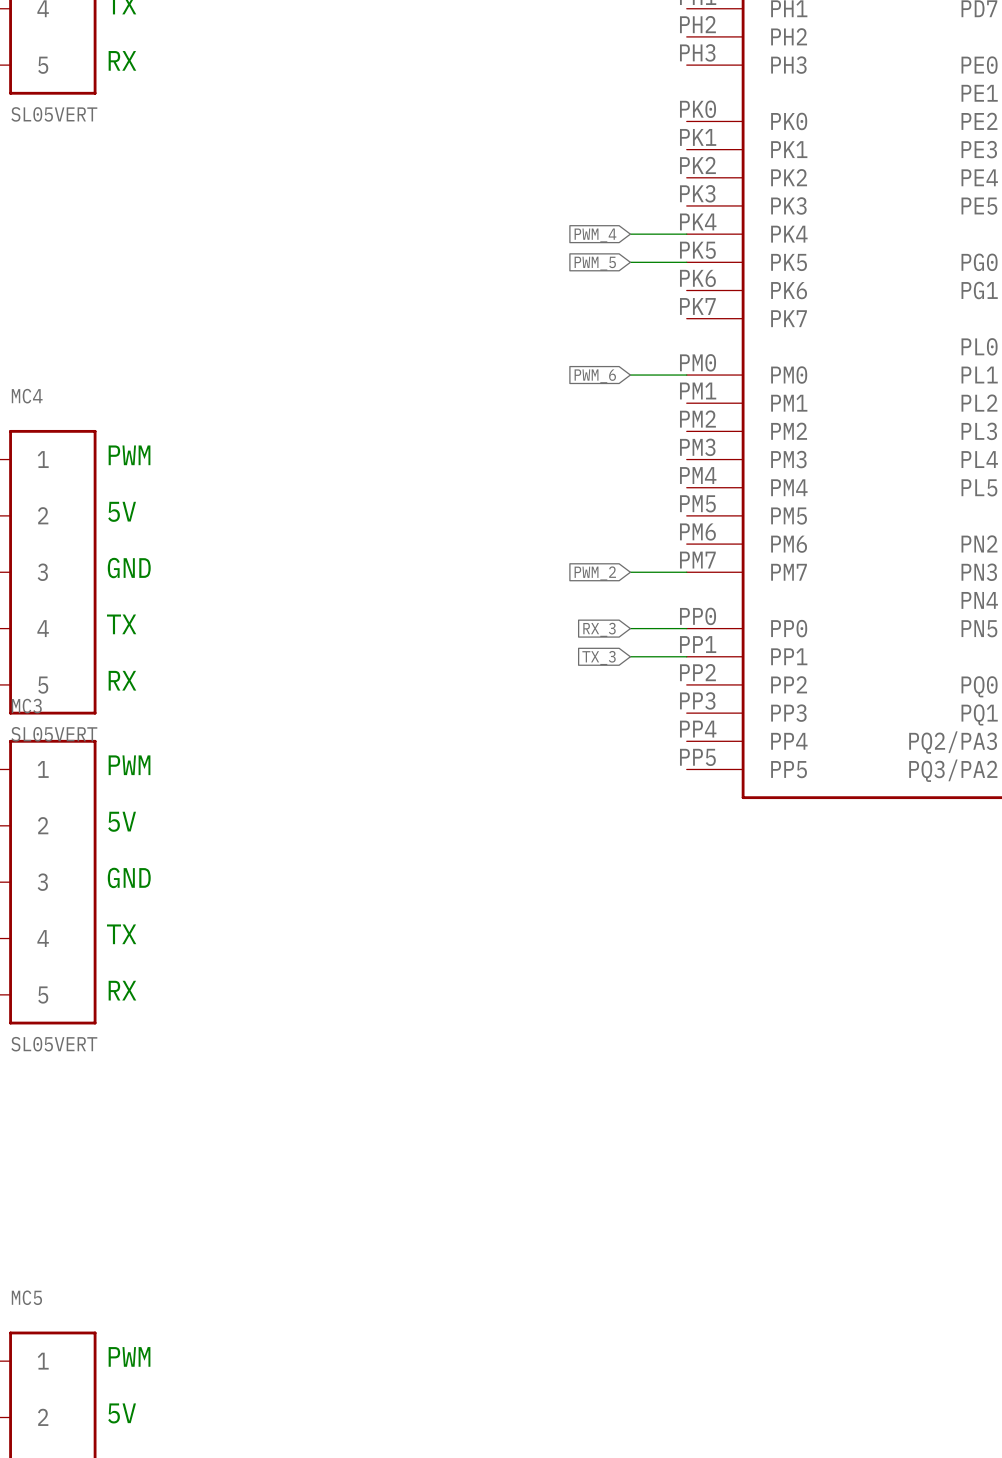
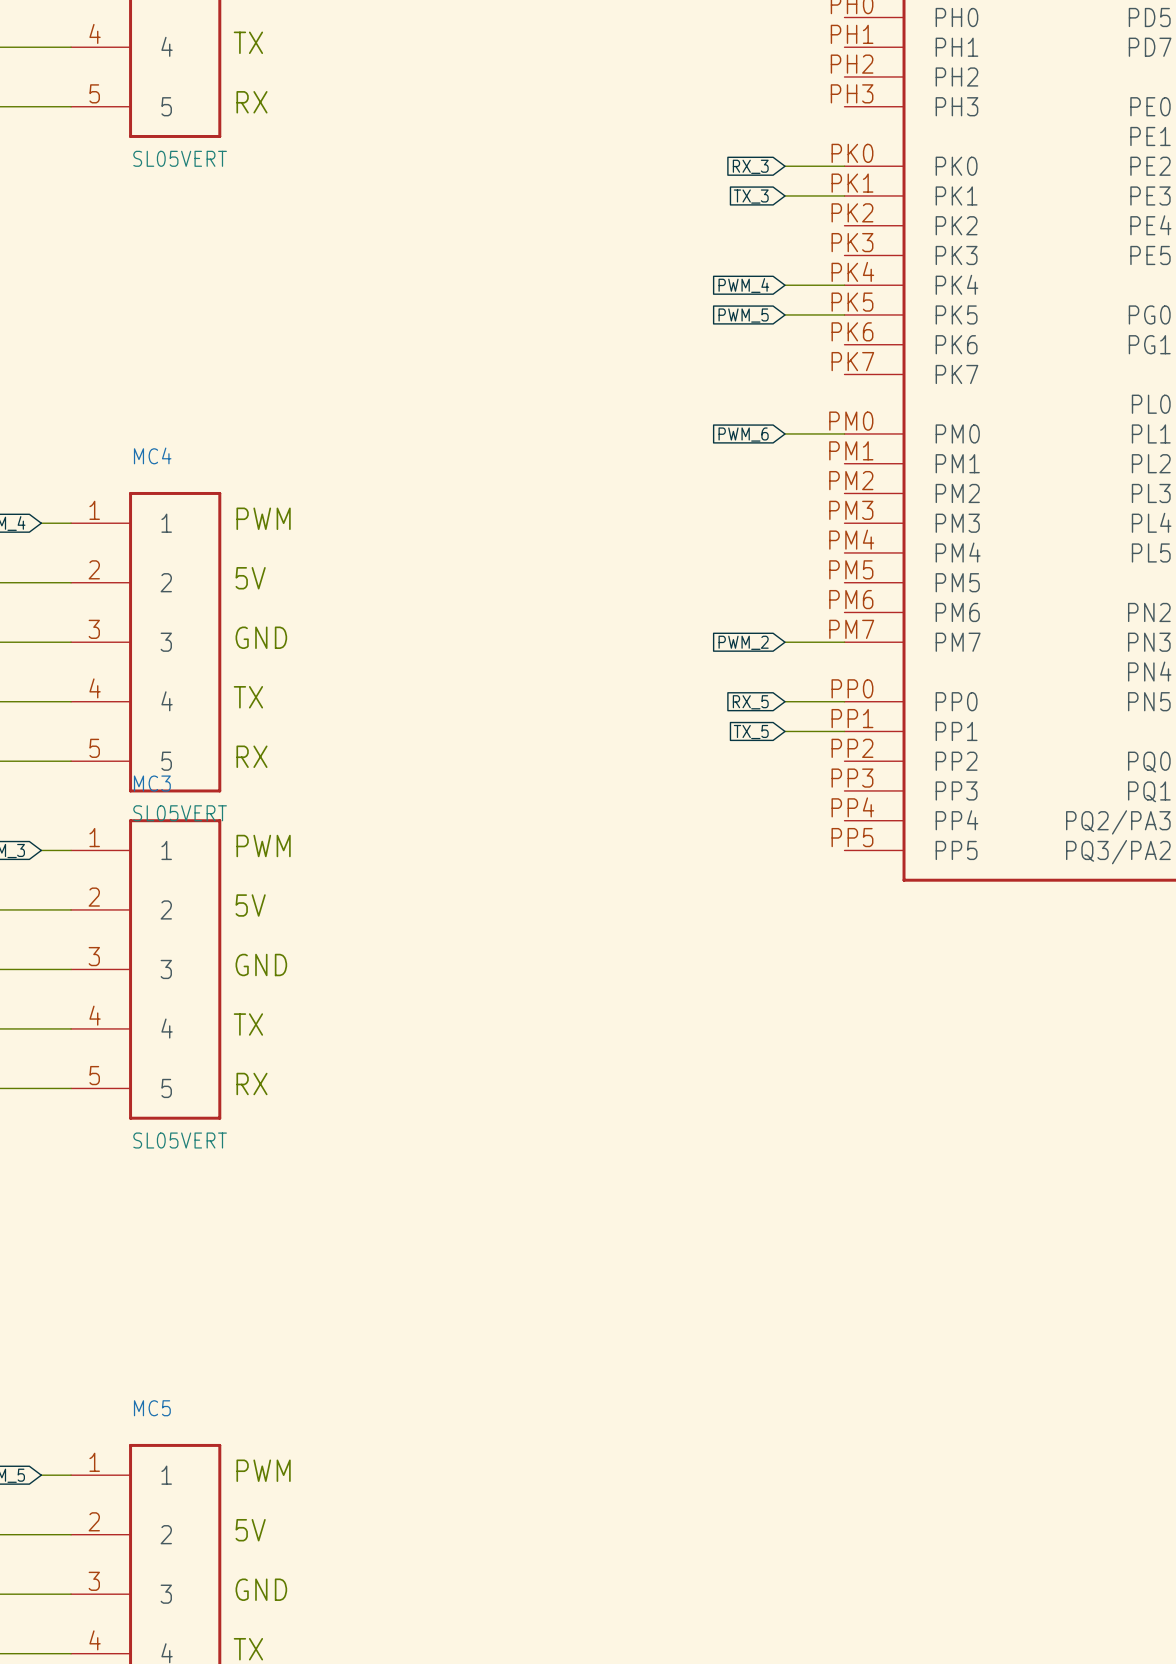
wire: none -> (785, 166) (844, 166)
global label: none -> RX_3 (750, 166)
wire: none -> (785, 195) (844, 195)
global label: none -> TX_3 (751, 196)
global label: RX_3 (599, 629) -> RX_5 (750, 702)
global label: TX_3 (599, 658) -> TX_5 (751, 732)

